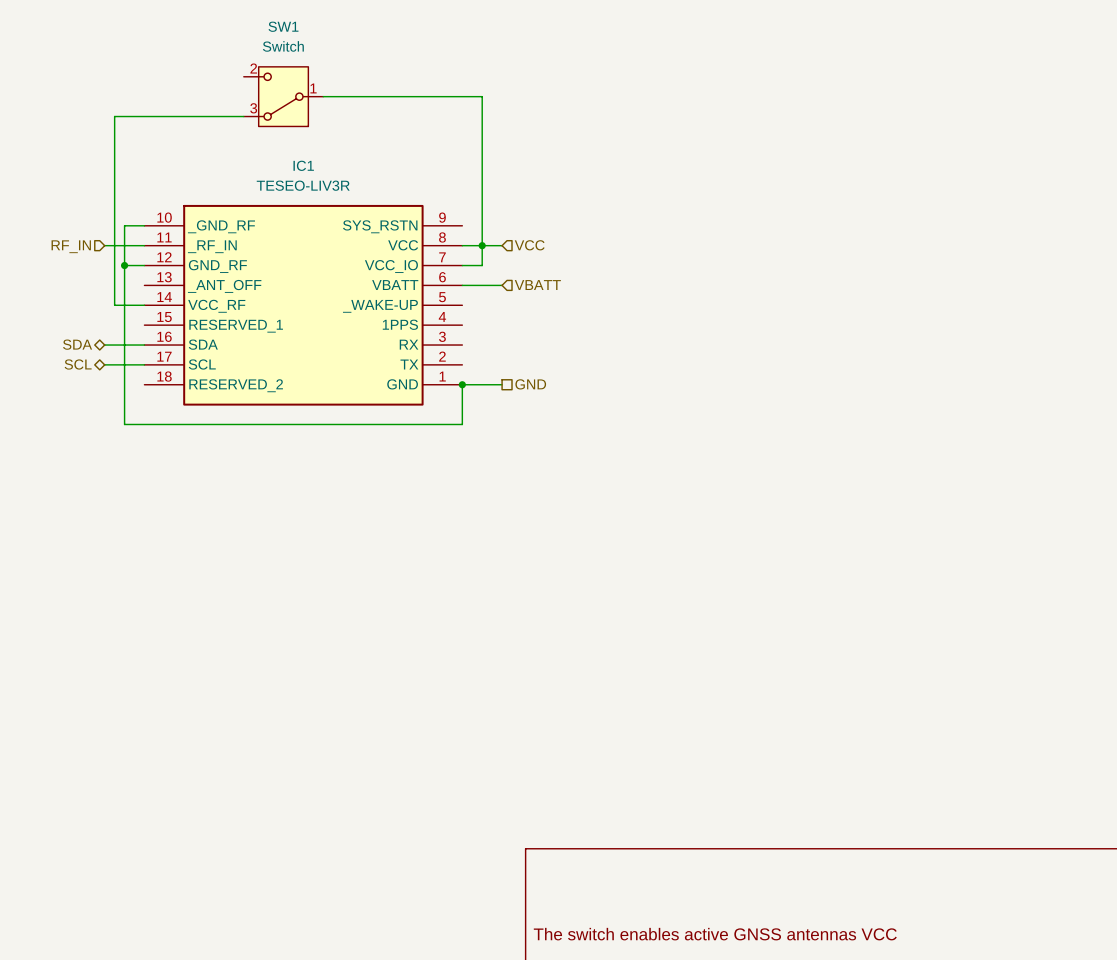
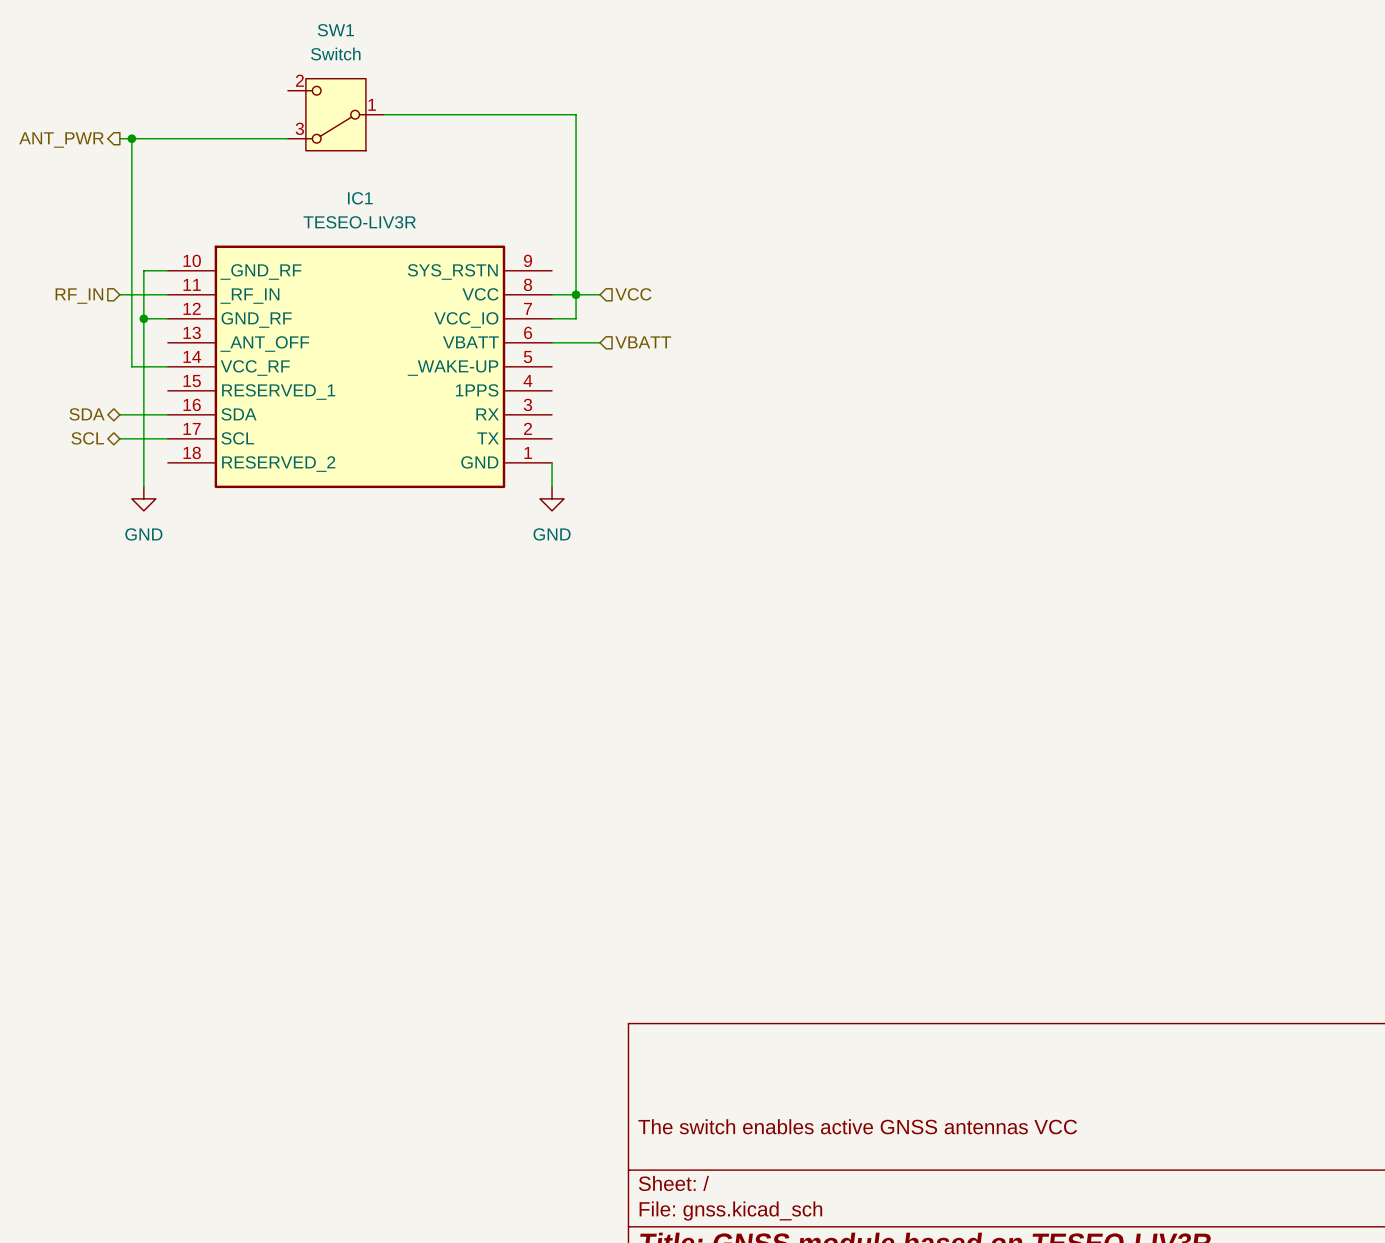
wire: none -> (119, 138) (131, 138)
junction: none -> (131, 138)
hierarchical label: none -> ANT_PWR (61, 140)
wire: (462, 384) (502, 384) -> none
junction: (462, 384) -> none
hierarchical label: GND (530, 384) -> none
wire: (124, 404) (124, 424) (462, 424) (462, 404) -> none
power symbol: none -> GND (143, 498)
power symbol: none -> GND (552, 498)

